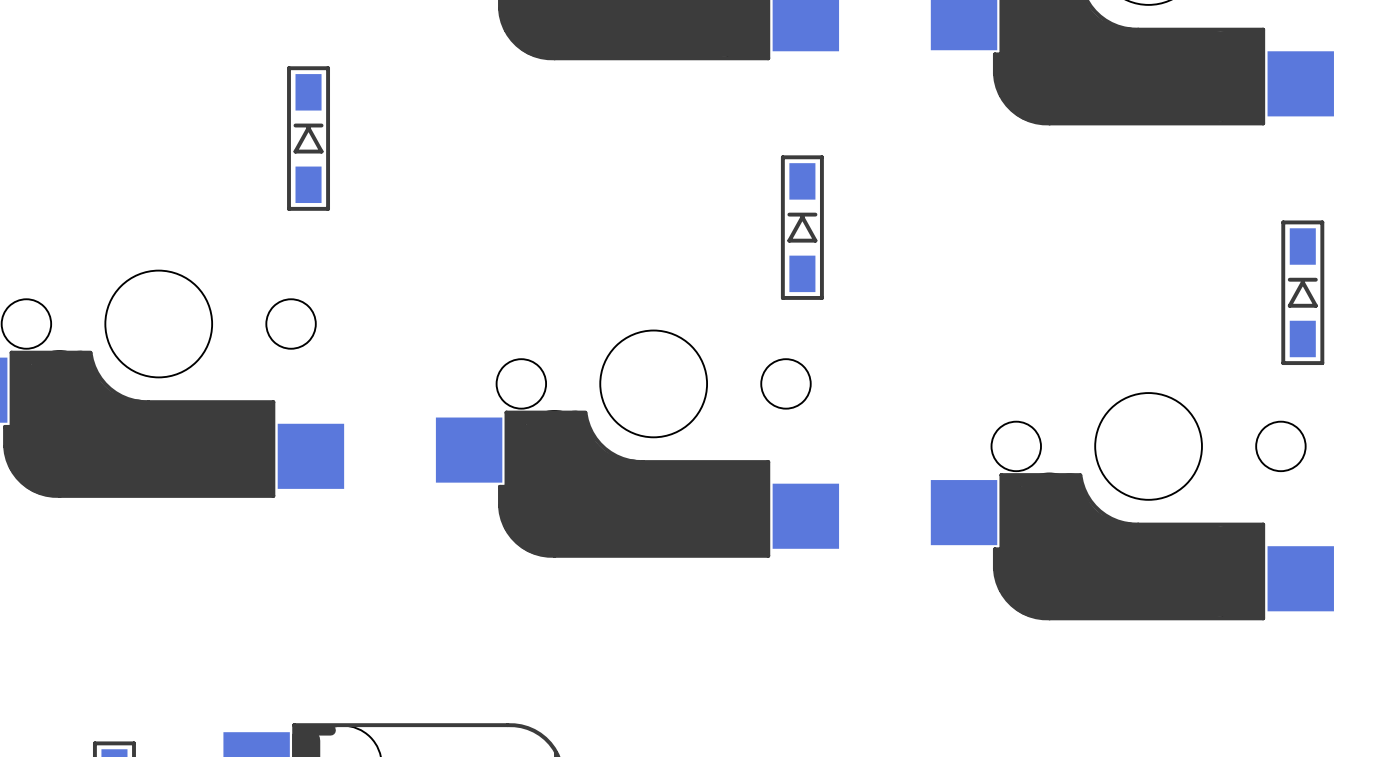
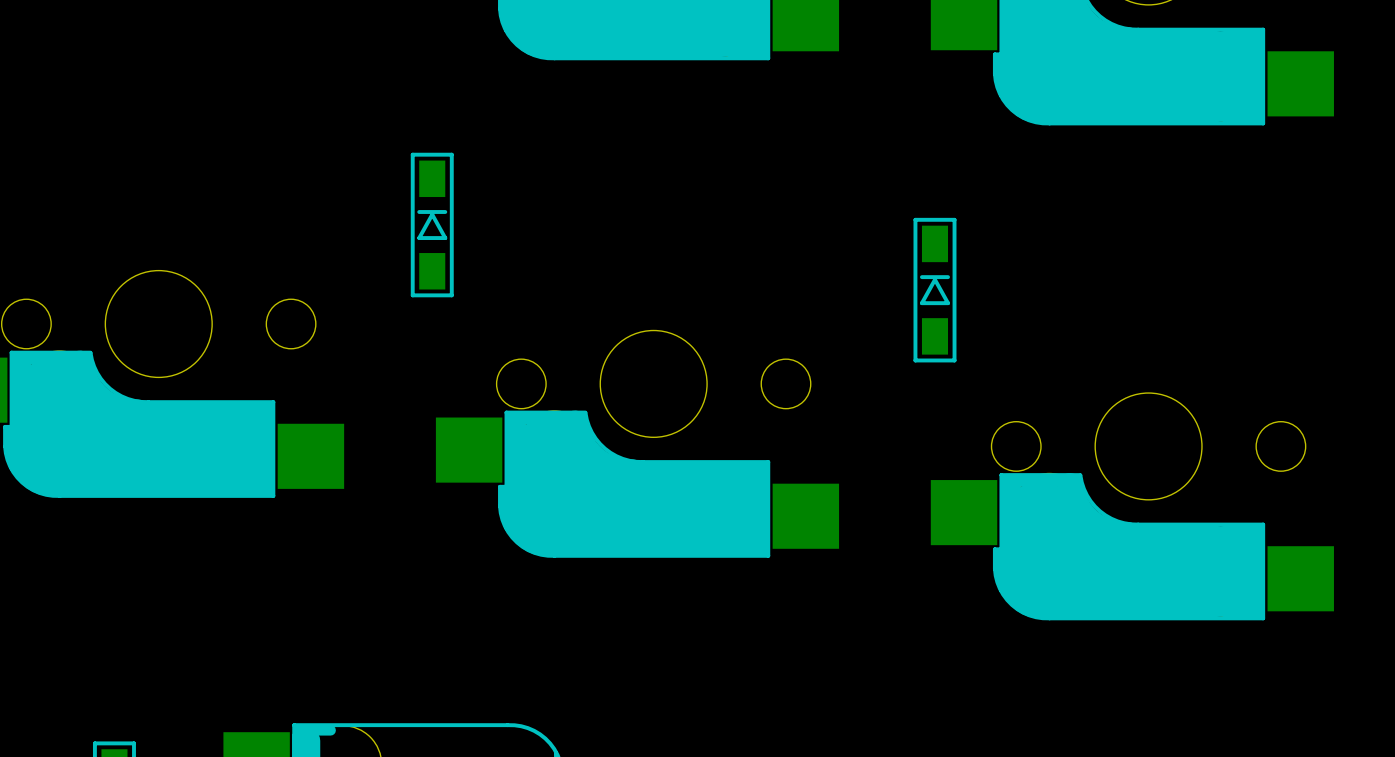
part position: (308, 138) -> (432, 225)
part position: (802, 227) -> (934, 290)
part: (1302, 292) -> none

